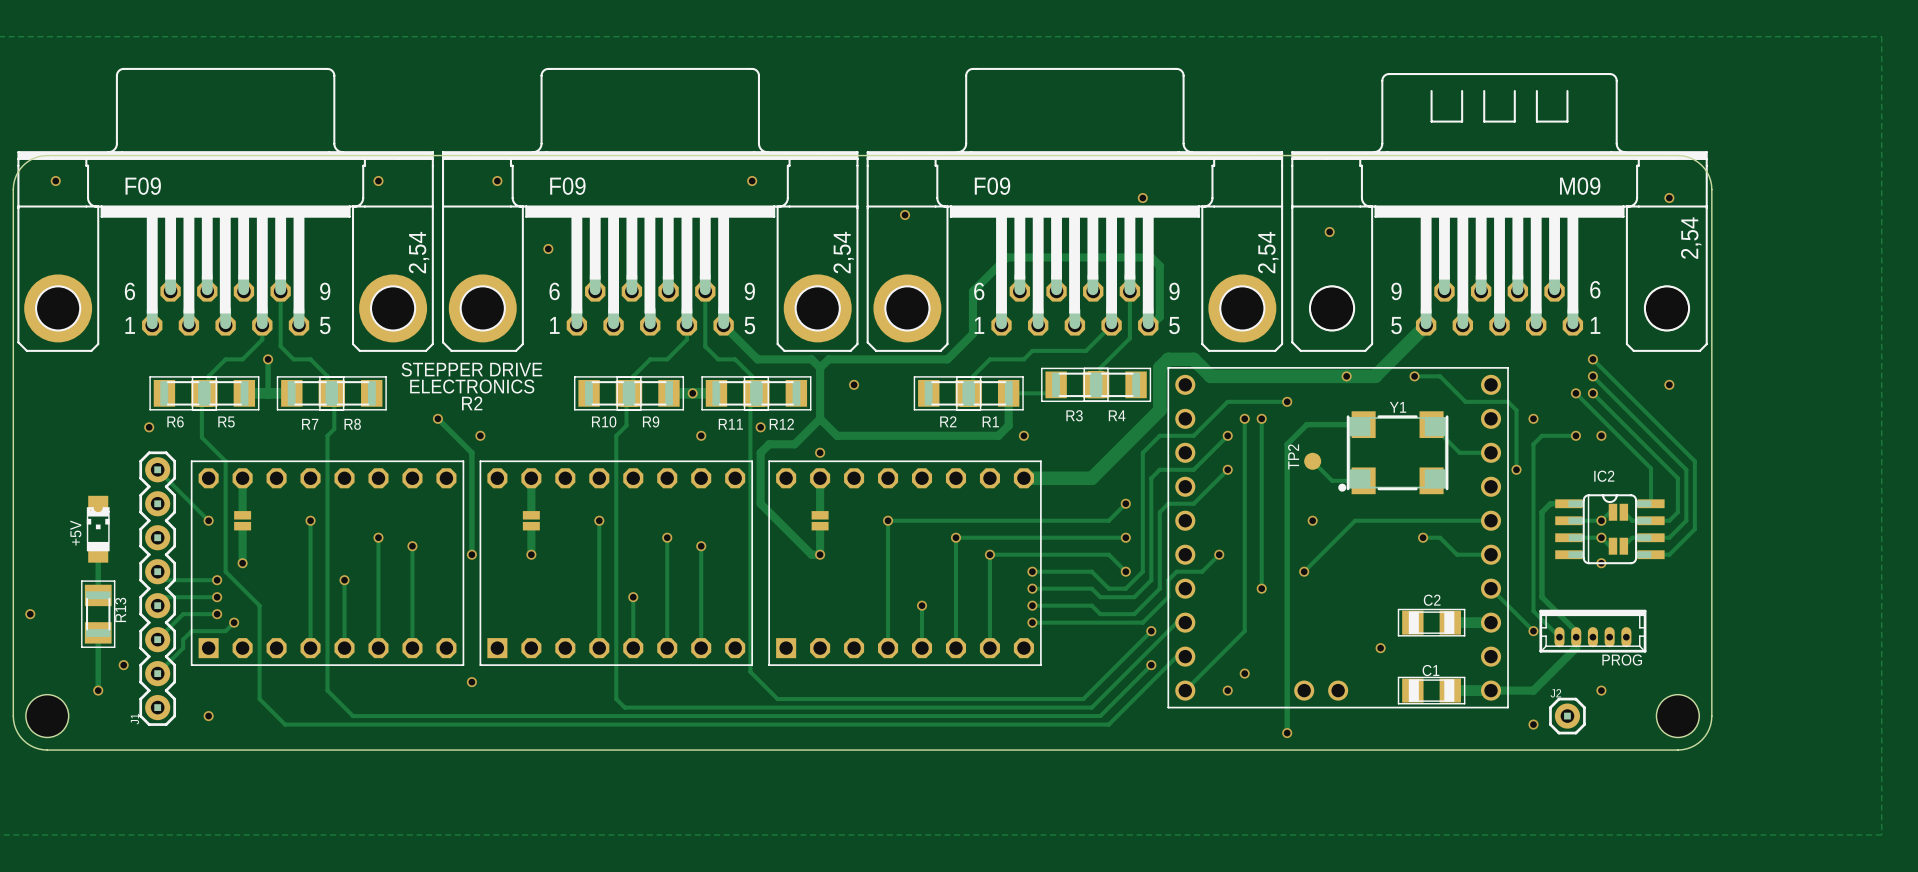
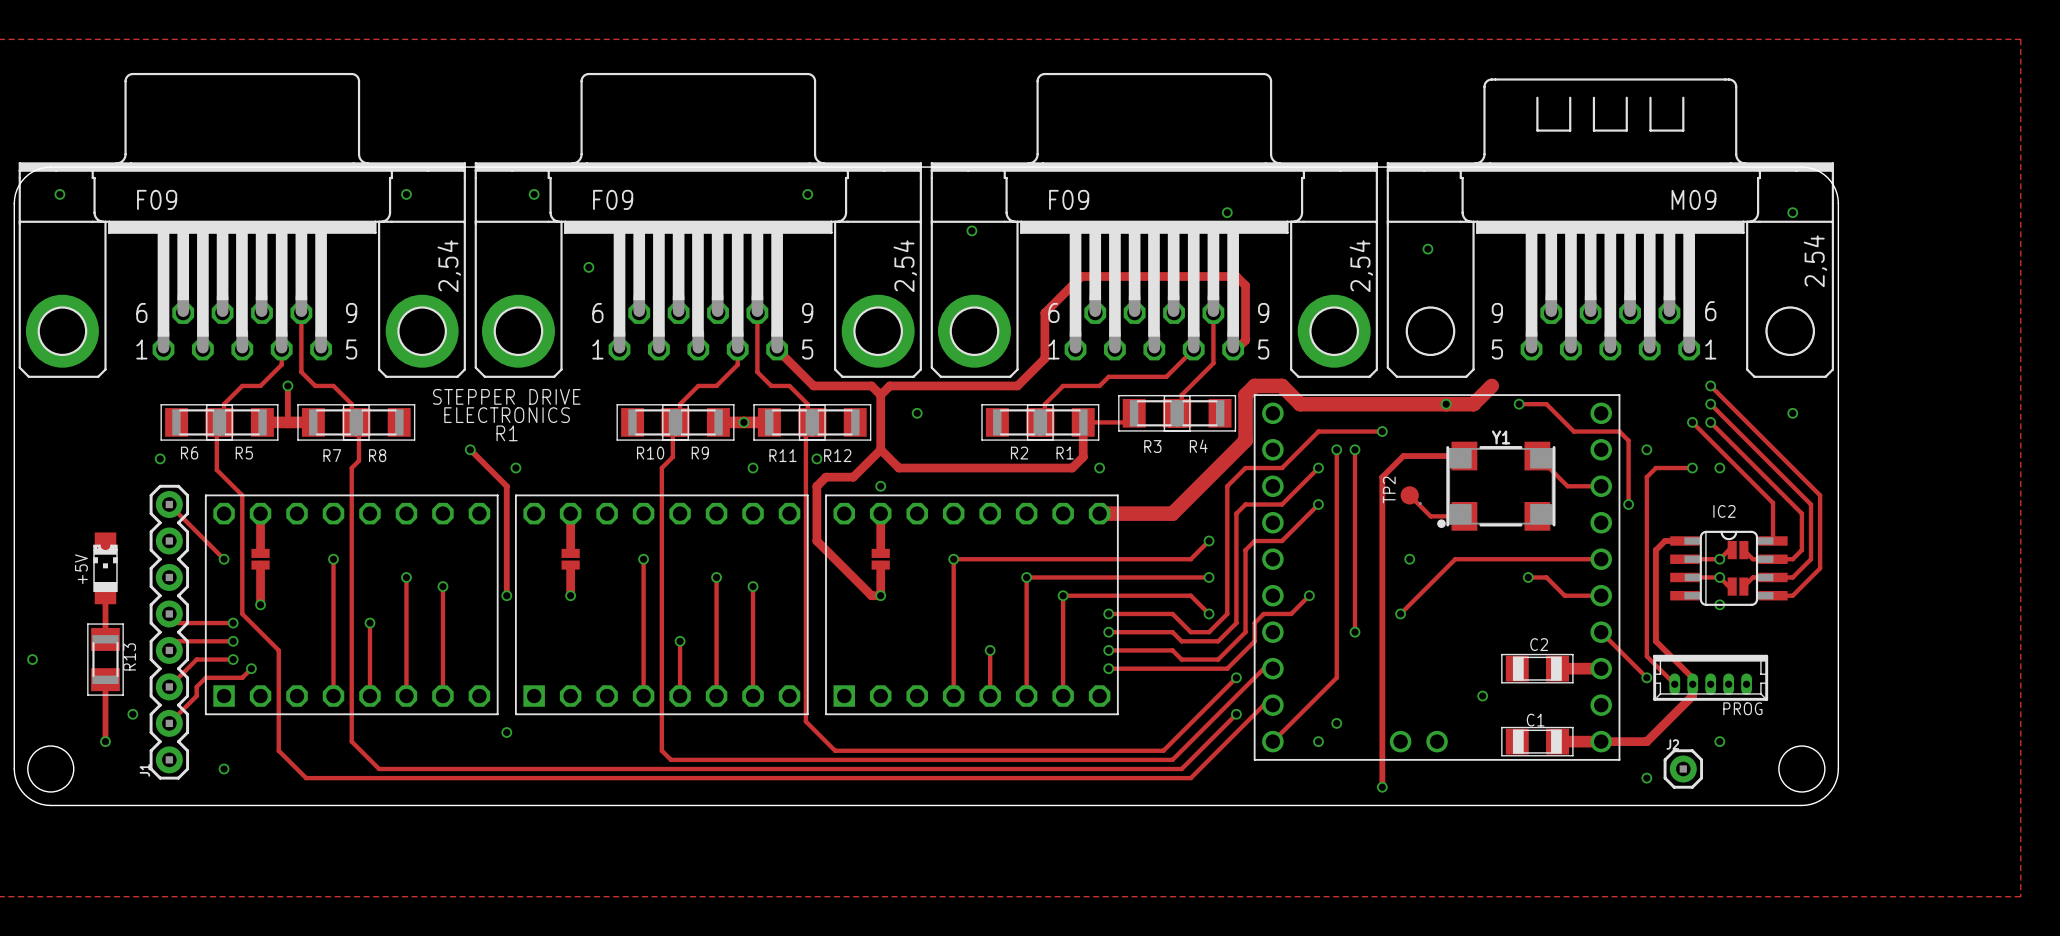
track: (1426, 325) (1375, 376) (1372, 376) -> (1491, 385) (1473, 404)
text: R2 (472, 403) -> R1 (507, 433)

